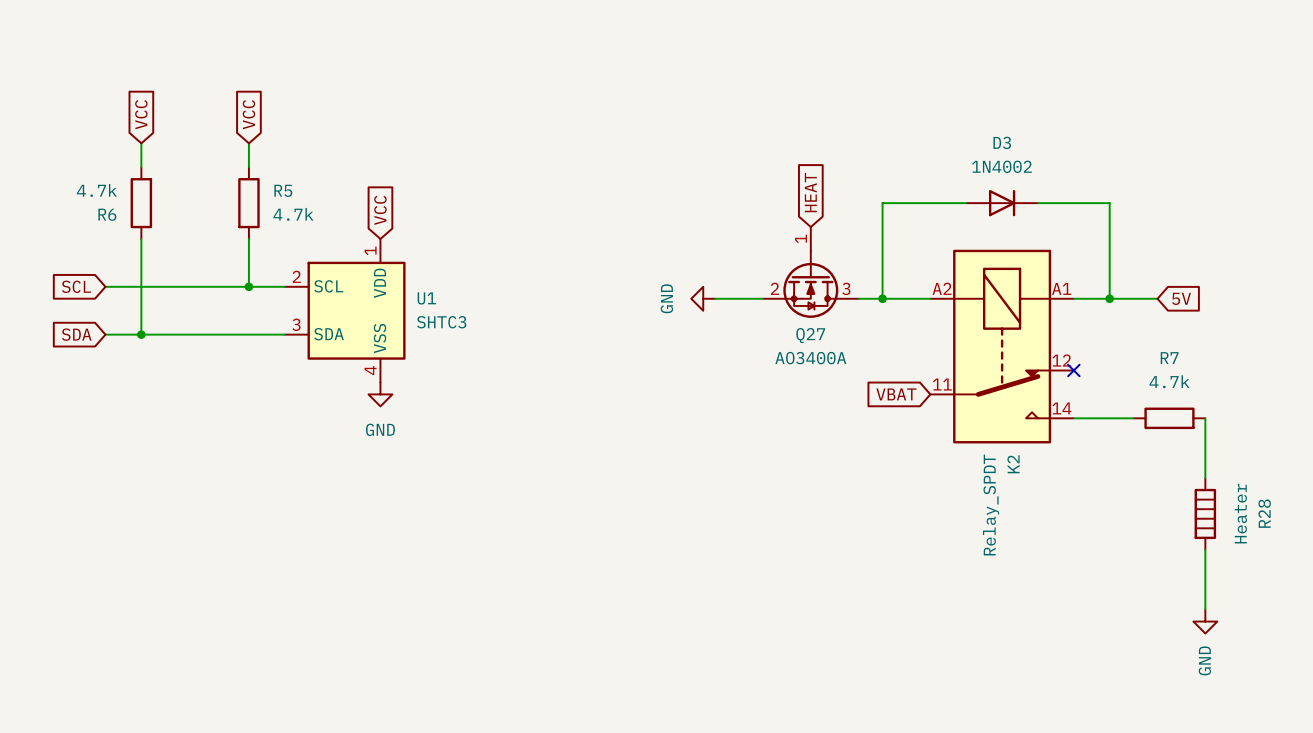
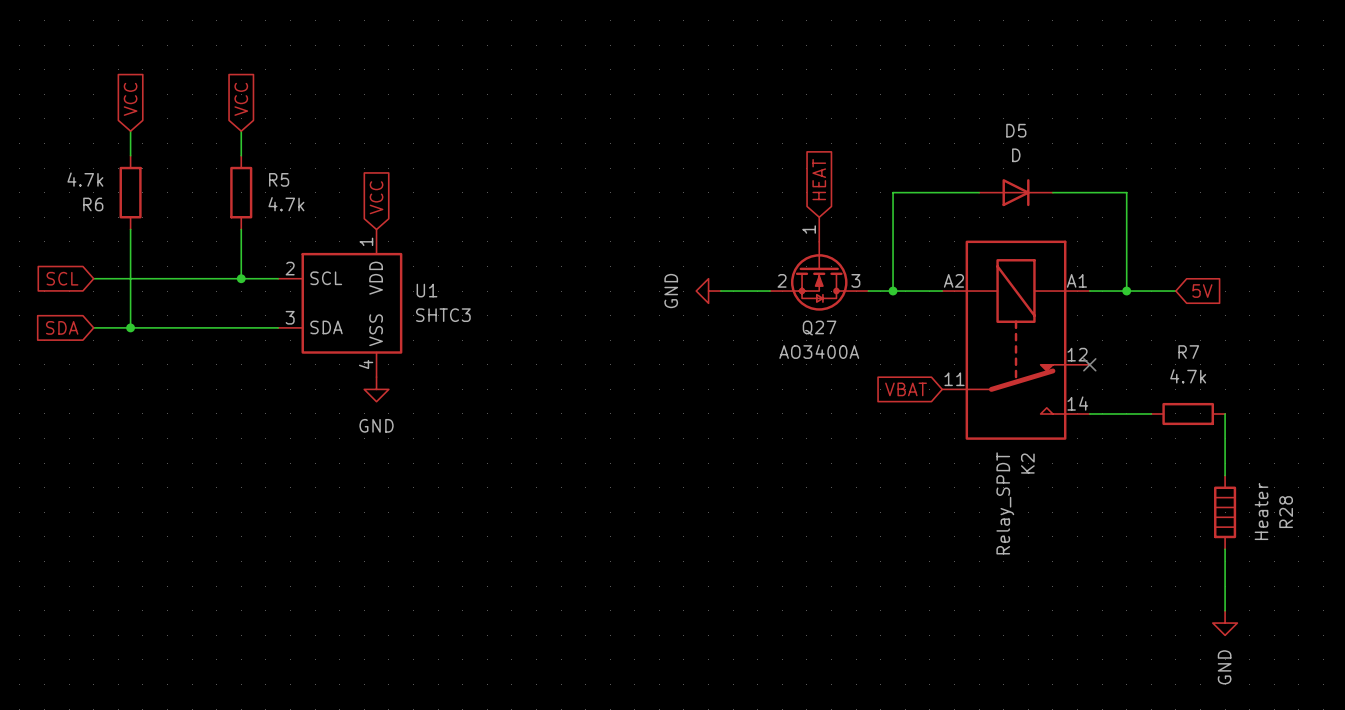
D3 name: D3 (1002, 142) -> D5 (1016, 130)
D3 value: 1N4002 (1002, 166) -> D (1016, 155)

